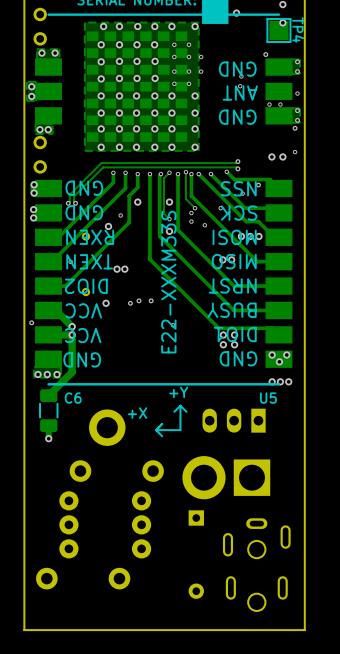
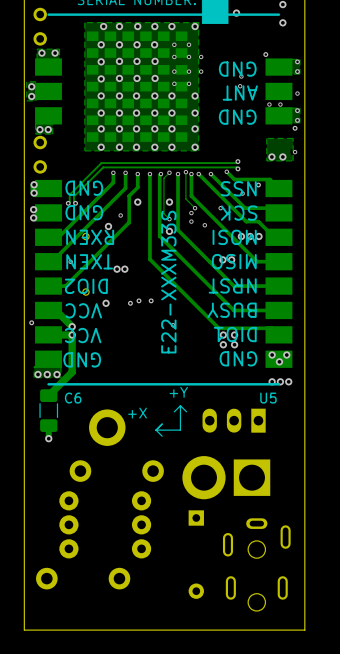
TP4: (278, 30) -> none
zone outline: none -> (293, 138) (266, 138) (266, 160) (293, 160) (293, 138)

